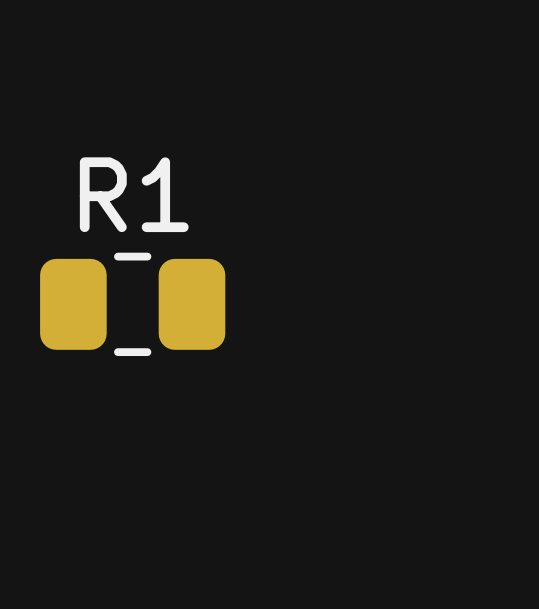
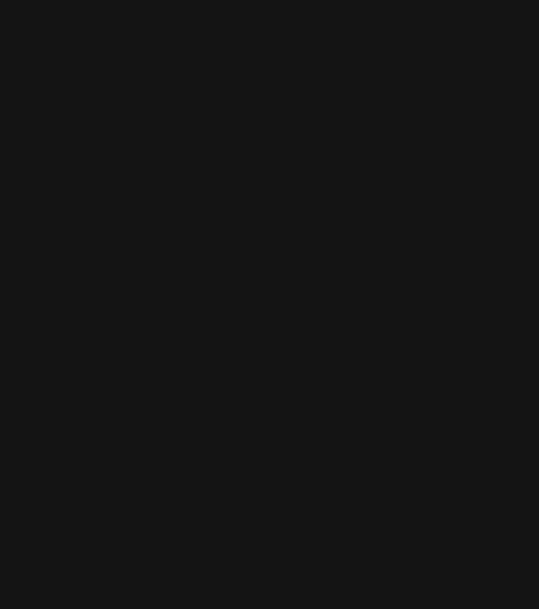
R1: (132, 304) -> none

